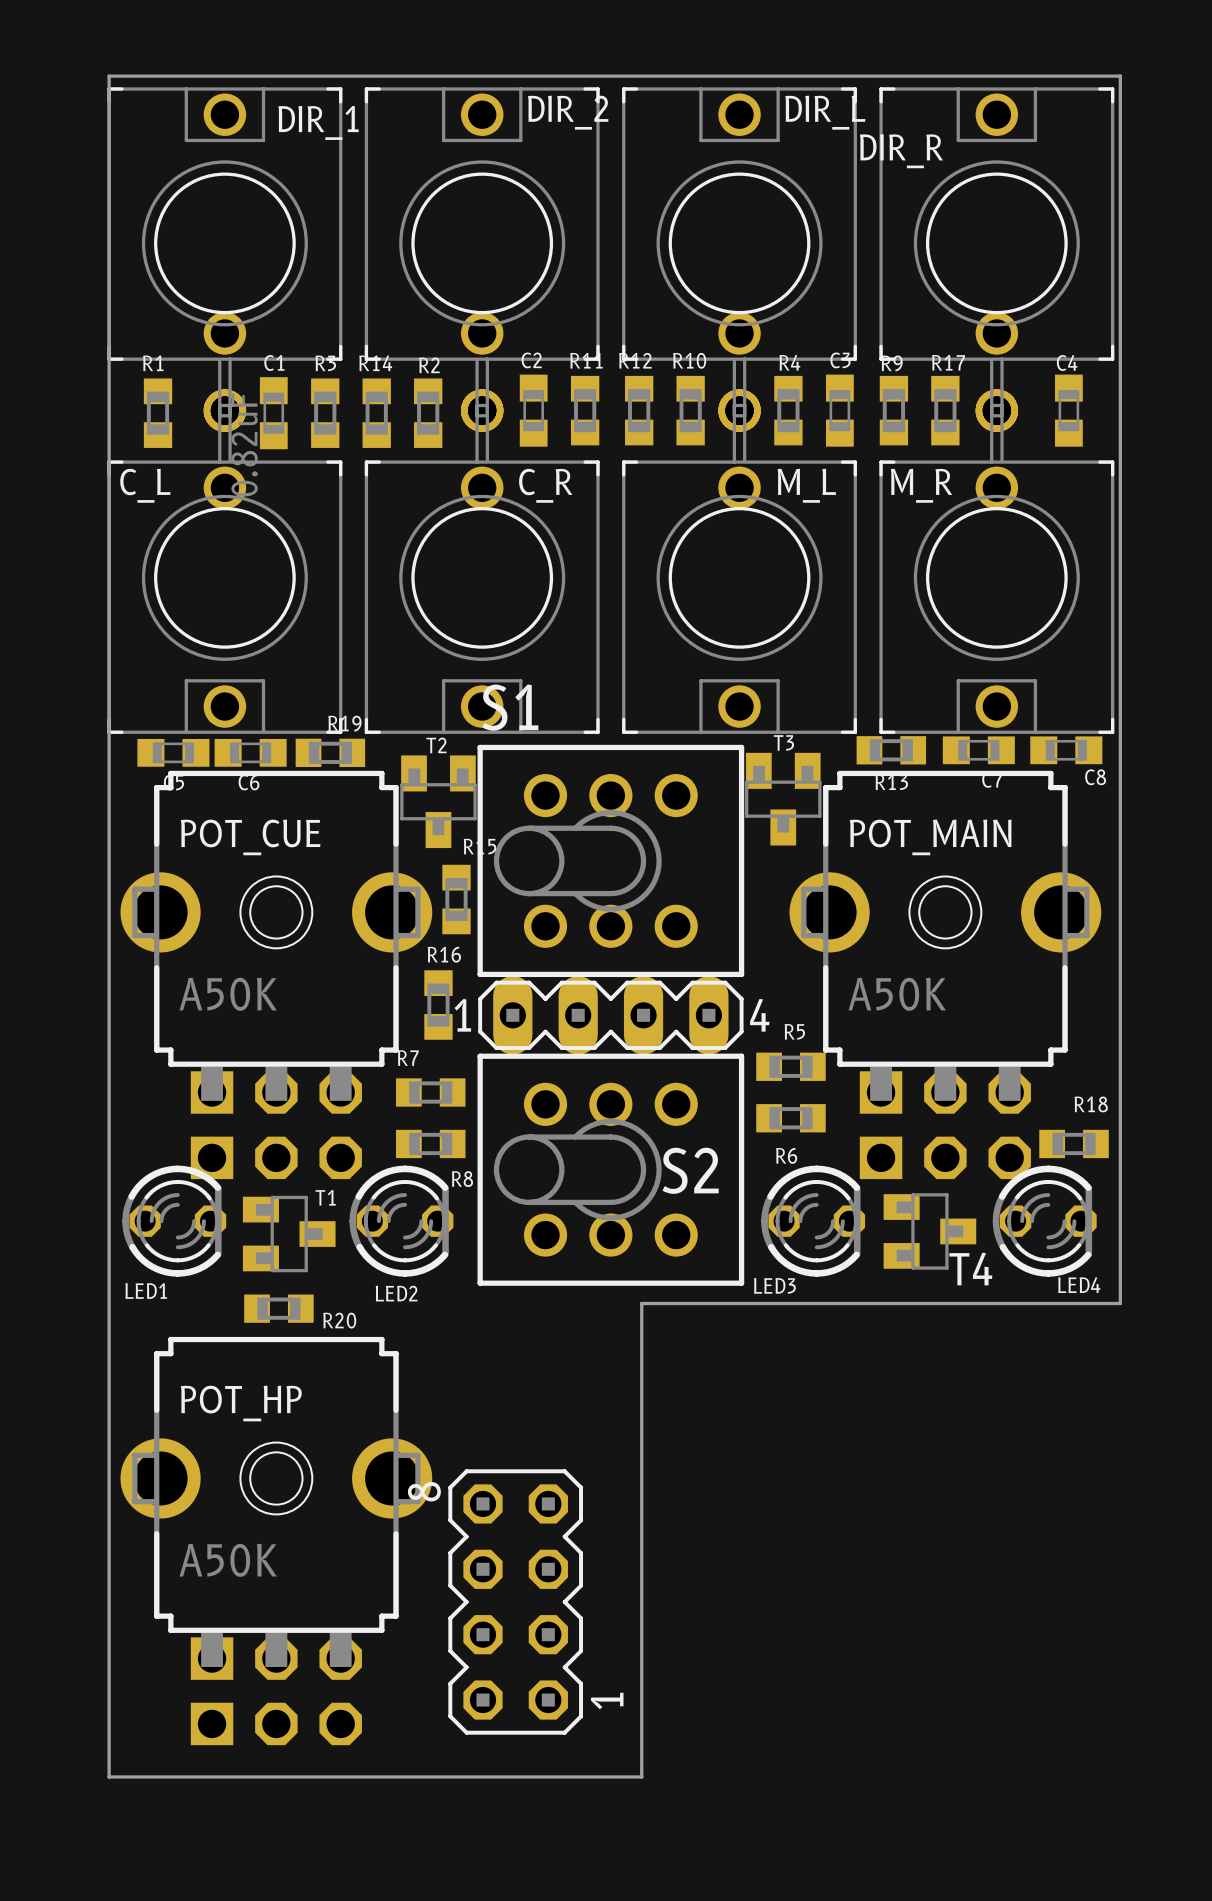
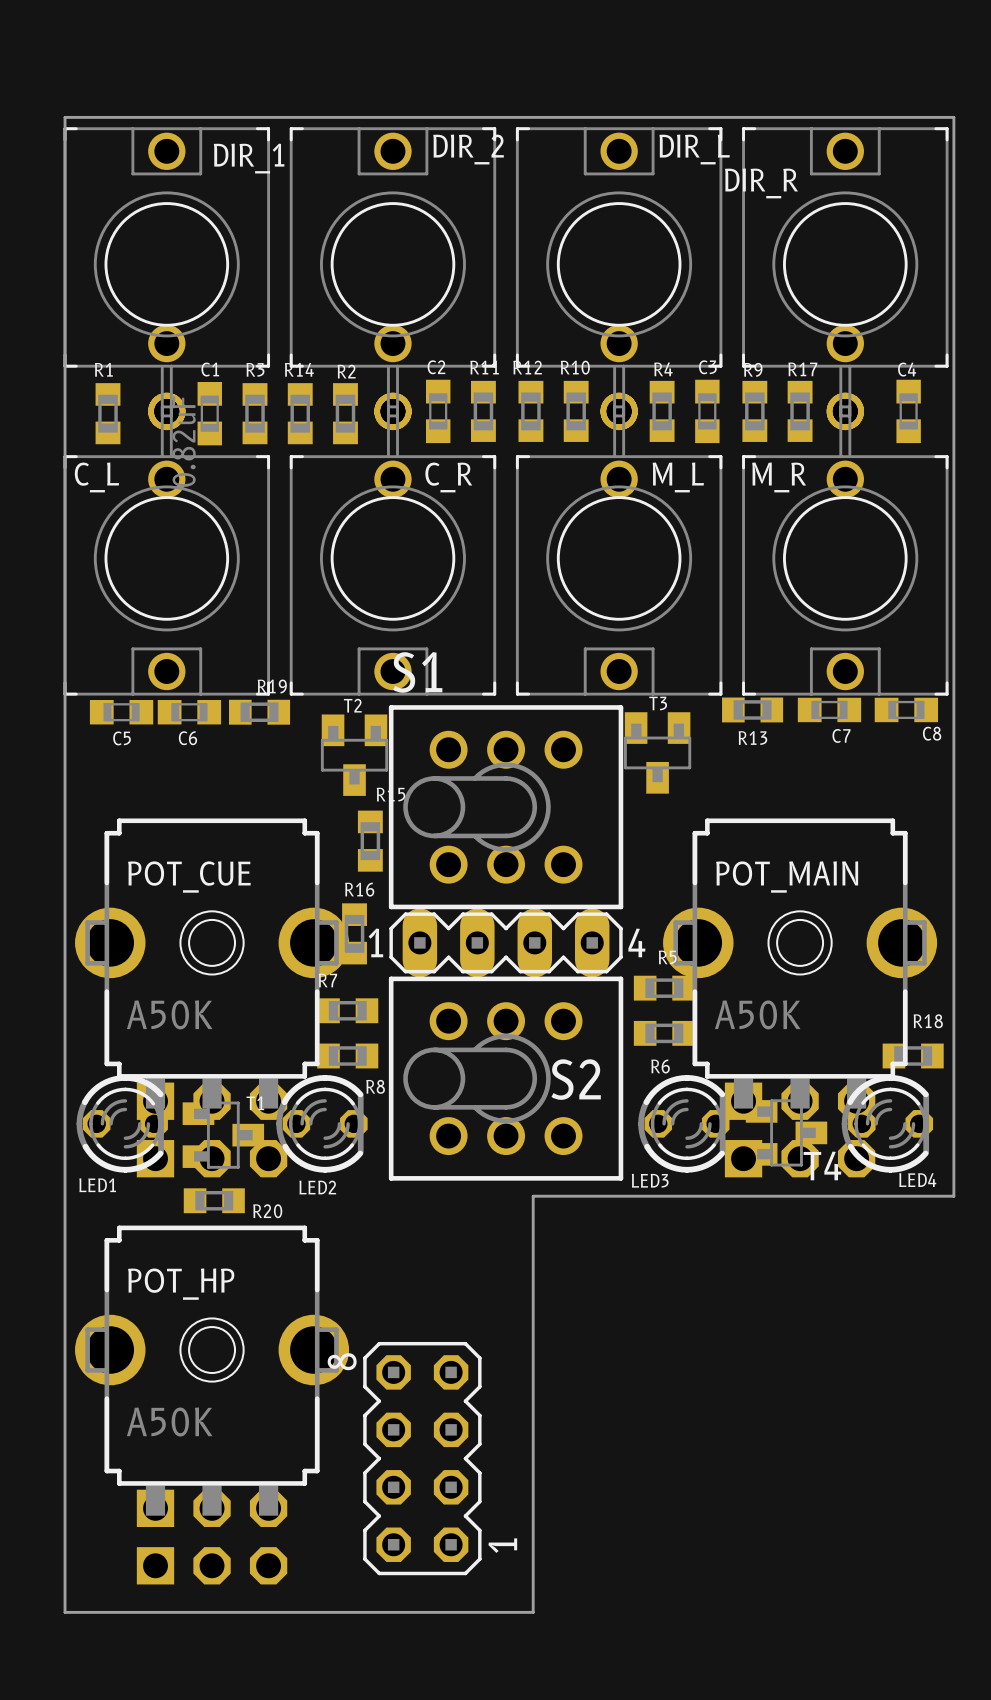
POT_CUE position: (276, 974) -> (212, 997)
POT_MAIN position: (945, 974) -> (800, 997)

